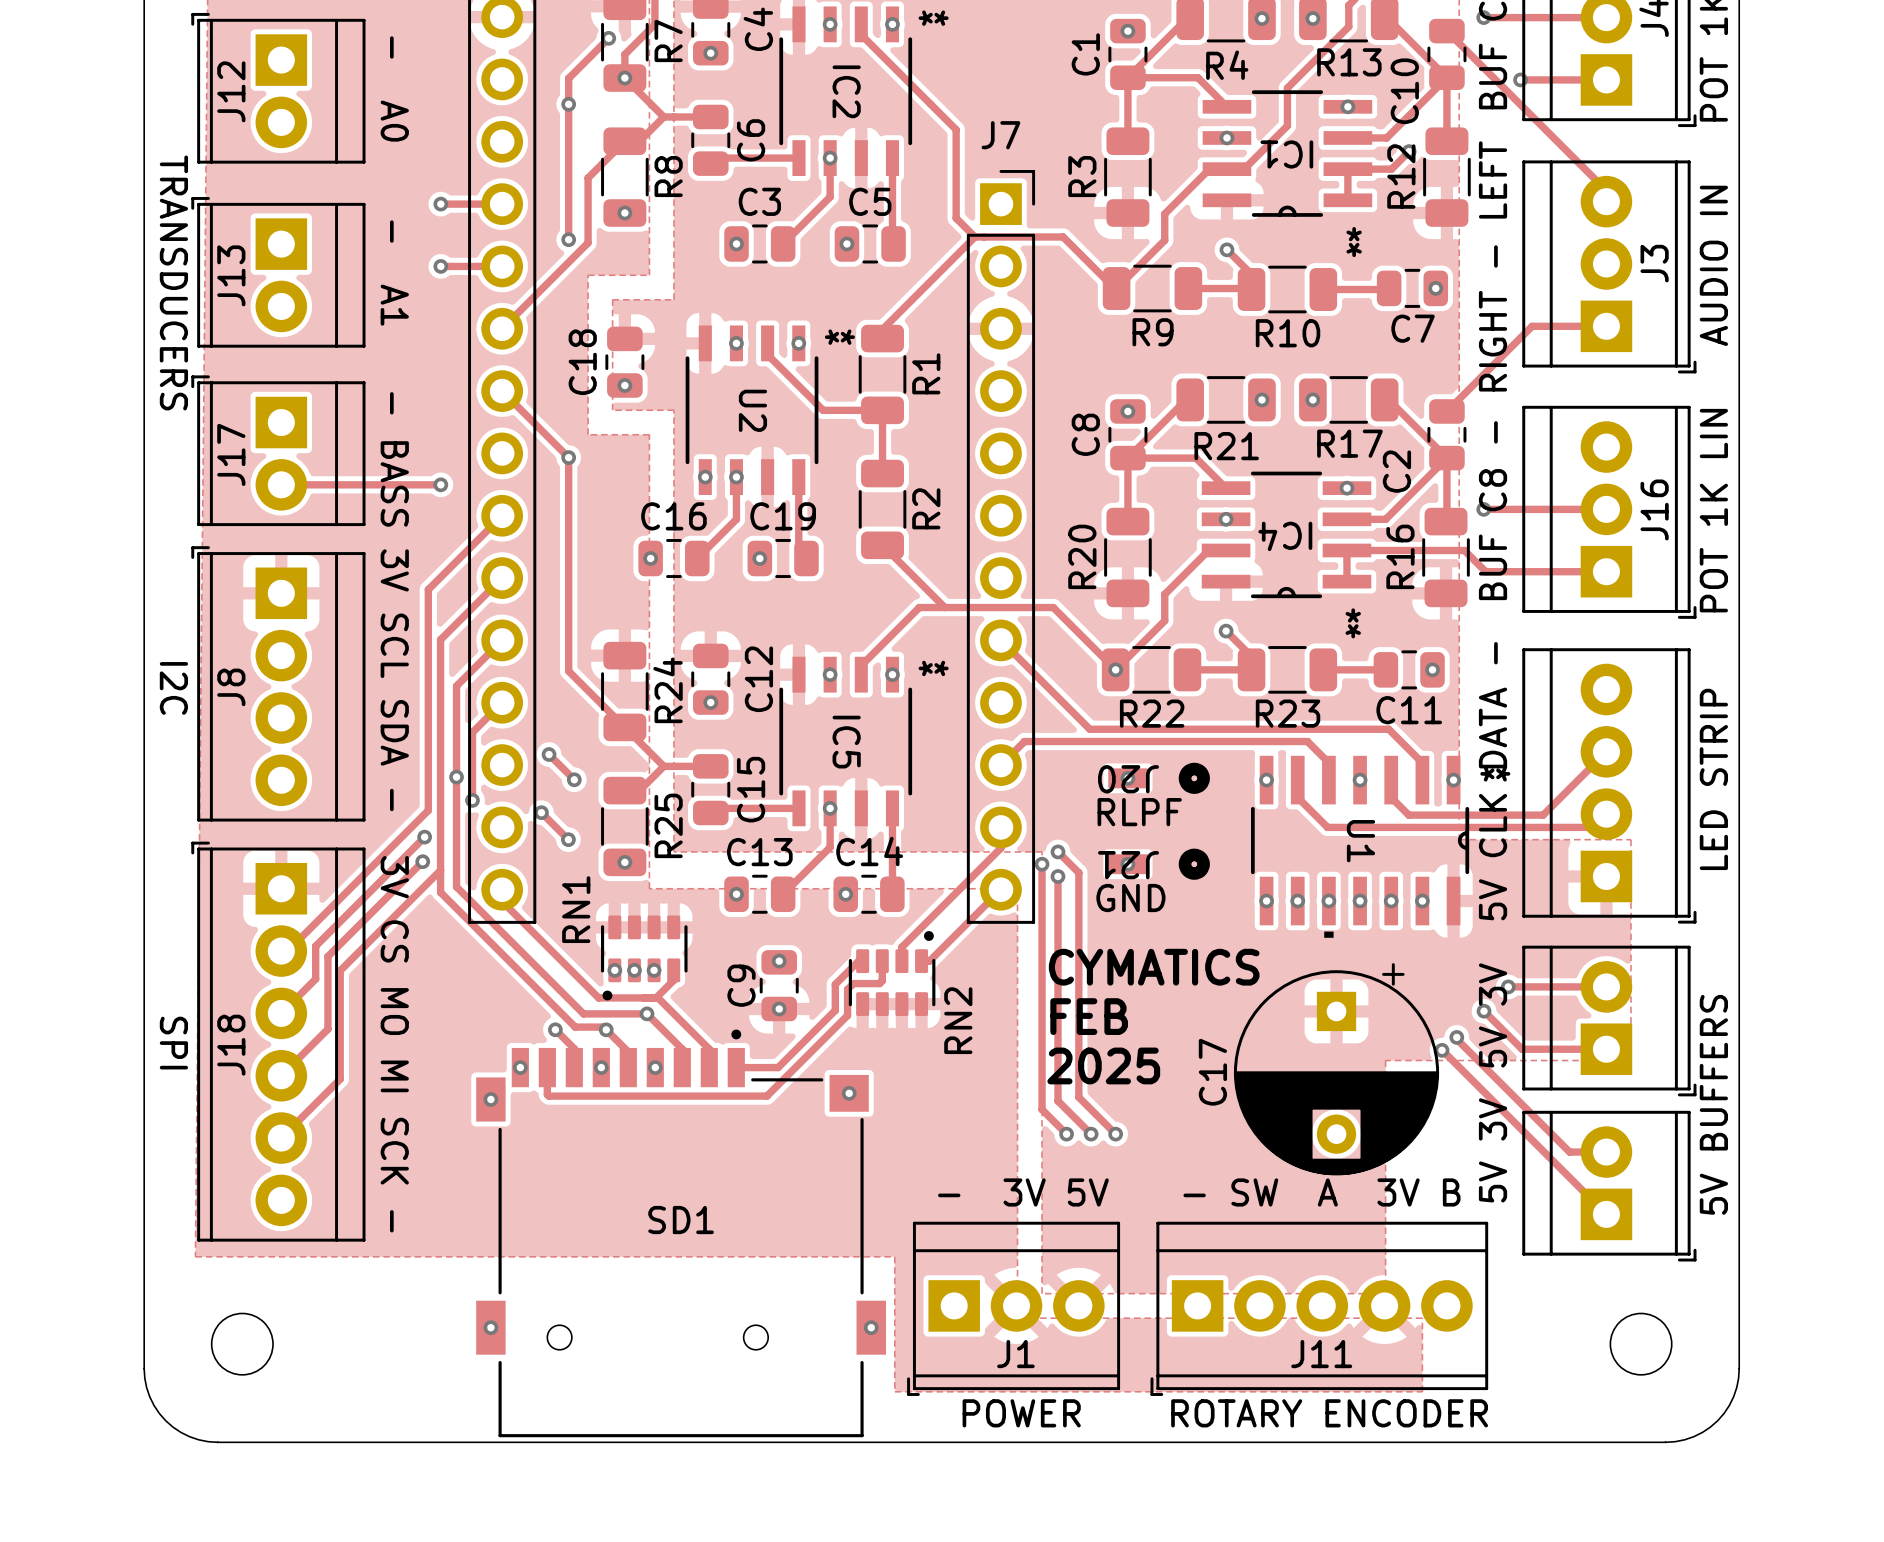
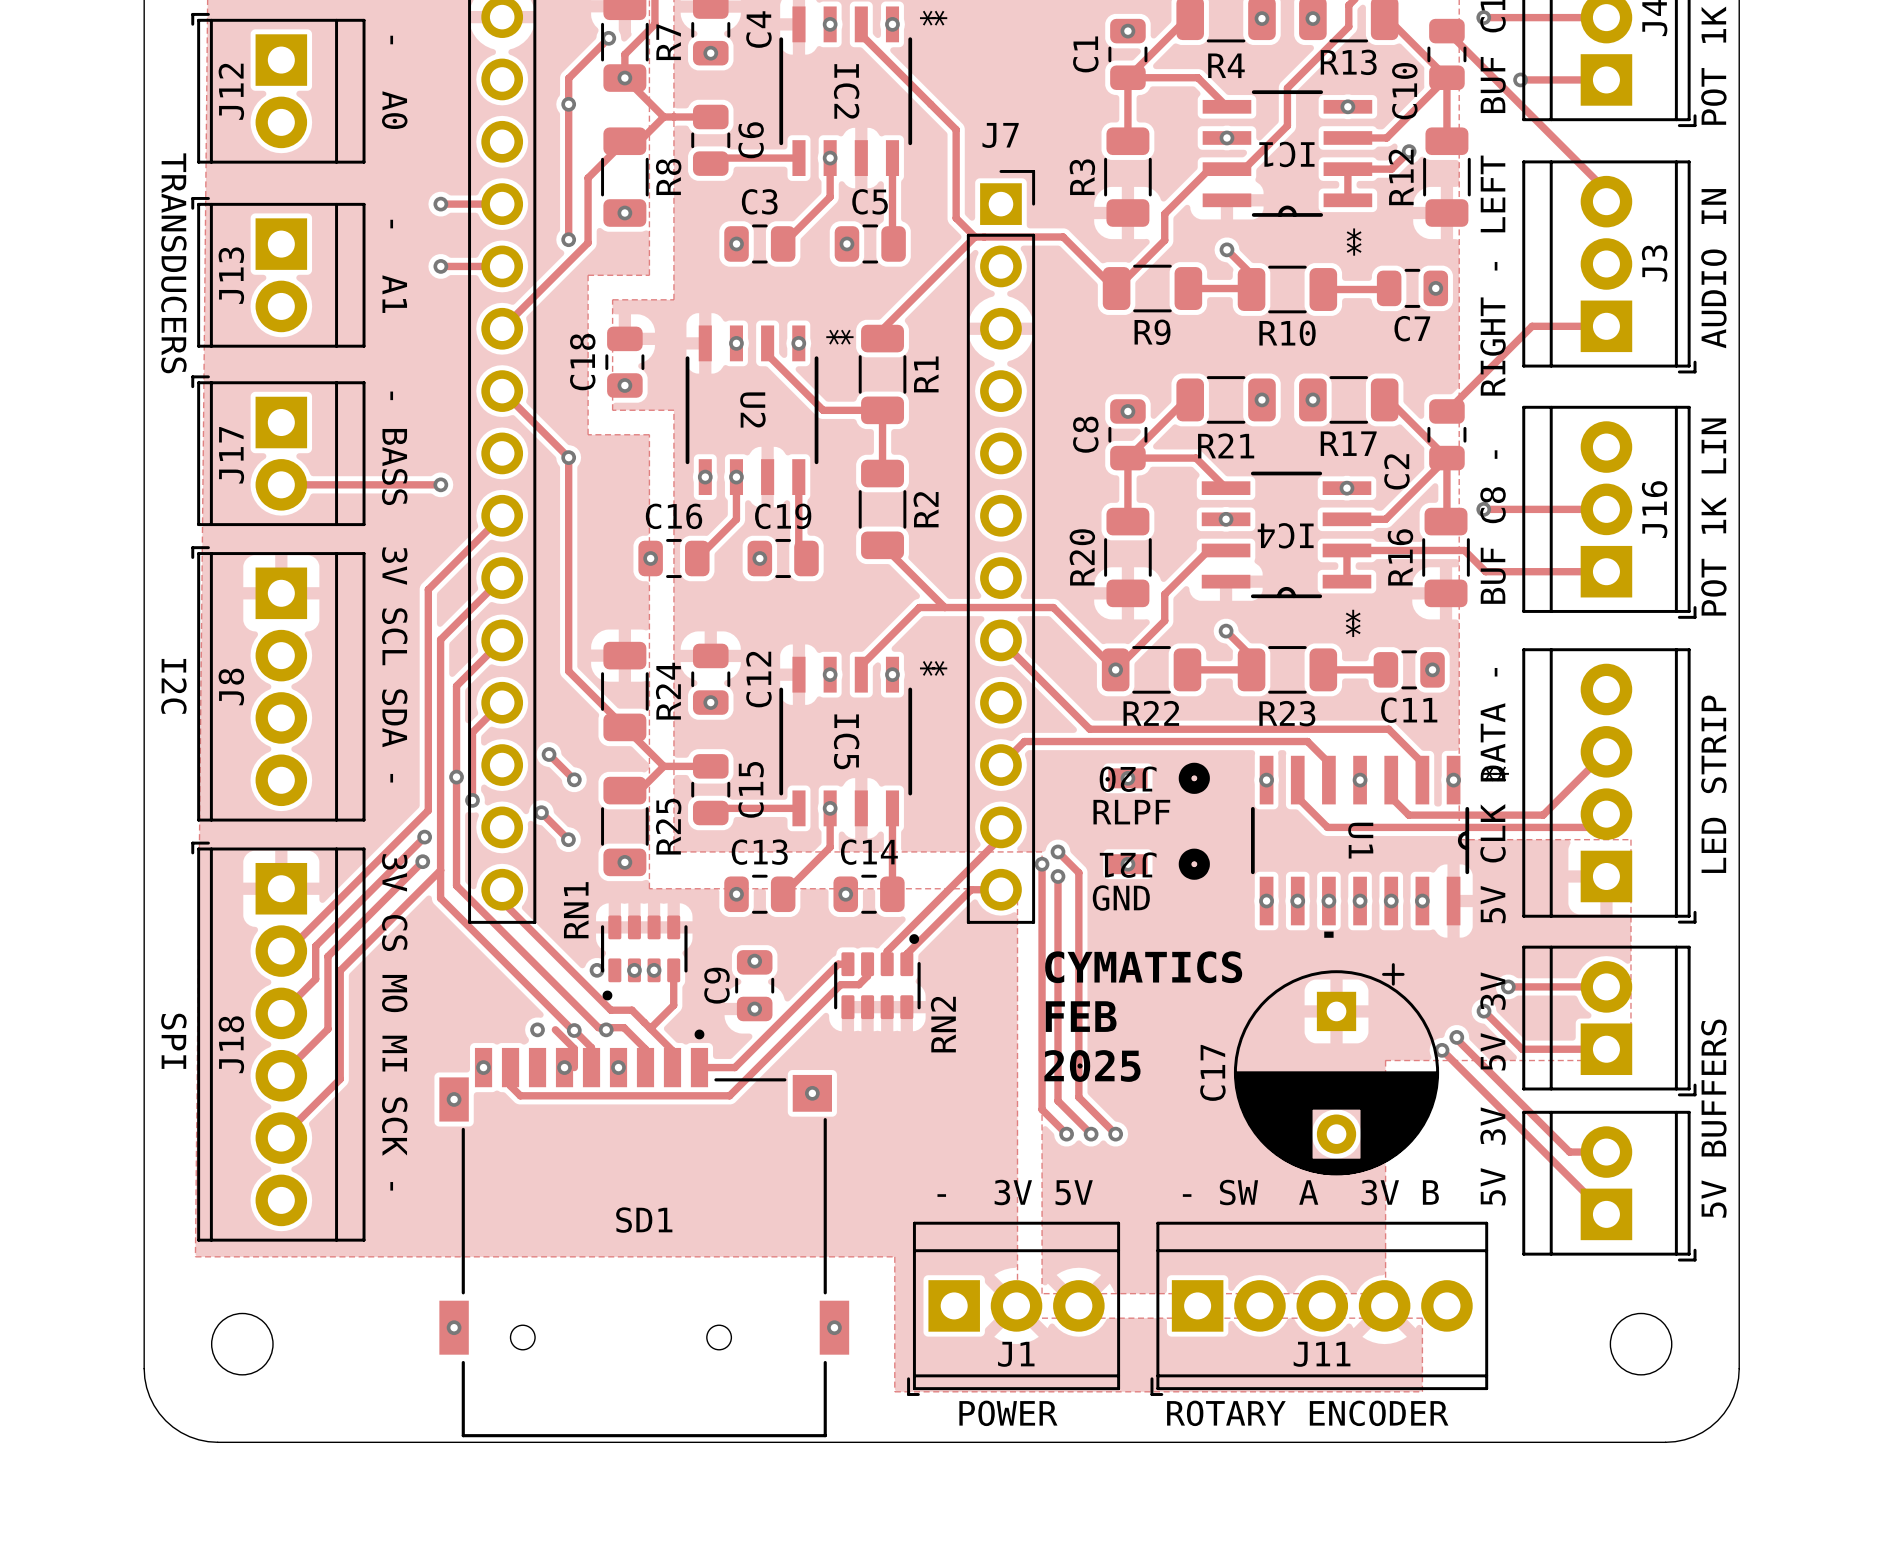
track: (1000, 837) (1000, 848) (901, 947) (901, 961) -> (1000, 837) (887, 951) (887, 964)
track: (456, 885) (583, 1013) (647, 1013) (682, 1049) (682, 1067) -> (456, 885) (598, 1027) (623, 1027) (645, 1049) (645, 1067)
track: (1000, 889) (929, 961) (921, 961) -> (1000, 889) (971, 889) (906, 954) (906, 964)
track: (440, 892) (575, 1027) (603, 1027) (628, 1051) (628, 1067) -> (440, 892) (440, 898) (591, 1047) (591, 1067)
via position: (779, 961) -> (754, 961)
track: (862, 961) (858, 961) (835, 984) (835, 1010) (778, 1067) (736, 1067) -> none
track: (882, 961) (882, 980) (879, 983) (853, 983) (847, 989) (847, 1015) (766, 1096) (548, 1096) (547, 1067) -> none
track: none -> (847, 964) (838, 964) (734, 1067) (699, 1067)
track: none -> (867, 964) (867, 976) (858, 984) (840, 984) (729, 1095) (520, 1095) (510, 1085) (510, 1067)
via position: (614, 970) -> (597, 970)
RN2 position: (892, 973) -> (877, 976)
track: (673, 980) (656, 997) (598, 997) -> (673, 980) (673, 1005) (650, 1028)
C9 position: (779, 985) -> (754, 985)
track: none -> (598, 997) (610, 1010) (631, 1010) (672, 1050) (672, 1067)
track: (644, 997) (657, 997) (709, 1049) (709, 1067) -> none
via position: (779, 1008) -> (754, 1008)
via: (647, 1013) -> none
via: none -> (537, 1029)
via: (555, 1029) -> none
via: none -> (574, 1030)
via: none -> (483, 1067)
via: (520, 1067) -> none
via: none -> (564, 1067)
via position: (601, 1067) -> (618, 1067)
via: (655, 1067) -> none
via position: (849, 1093) -> (812, 1093)
via: none -> (454, 1099)
via: (490, 1099) -> none
SD1 position: (681, 1233) -> (644, 1233)
via position: (490, 1327) -> (454, 1327)
via position: (871, 1327) -> (834, 1327)

